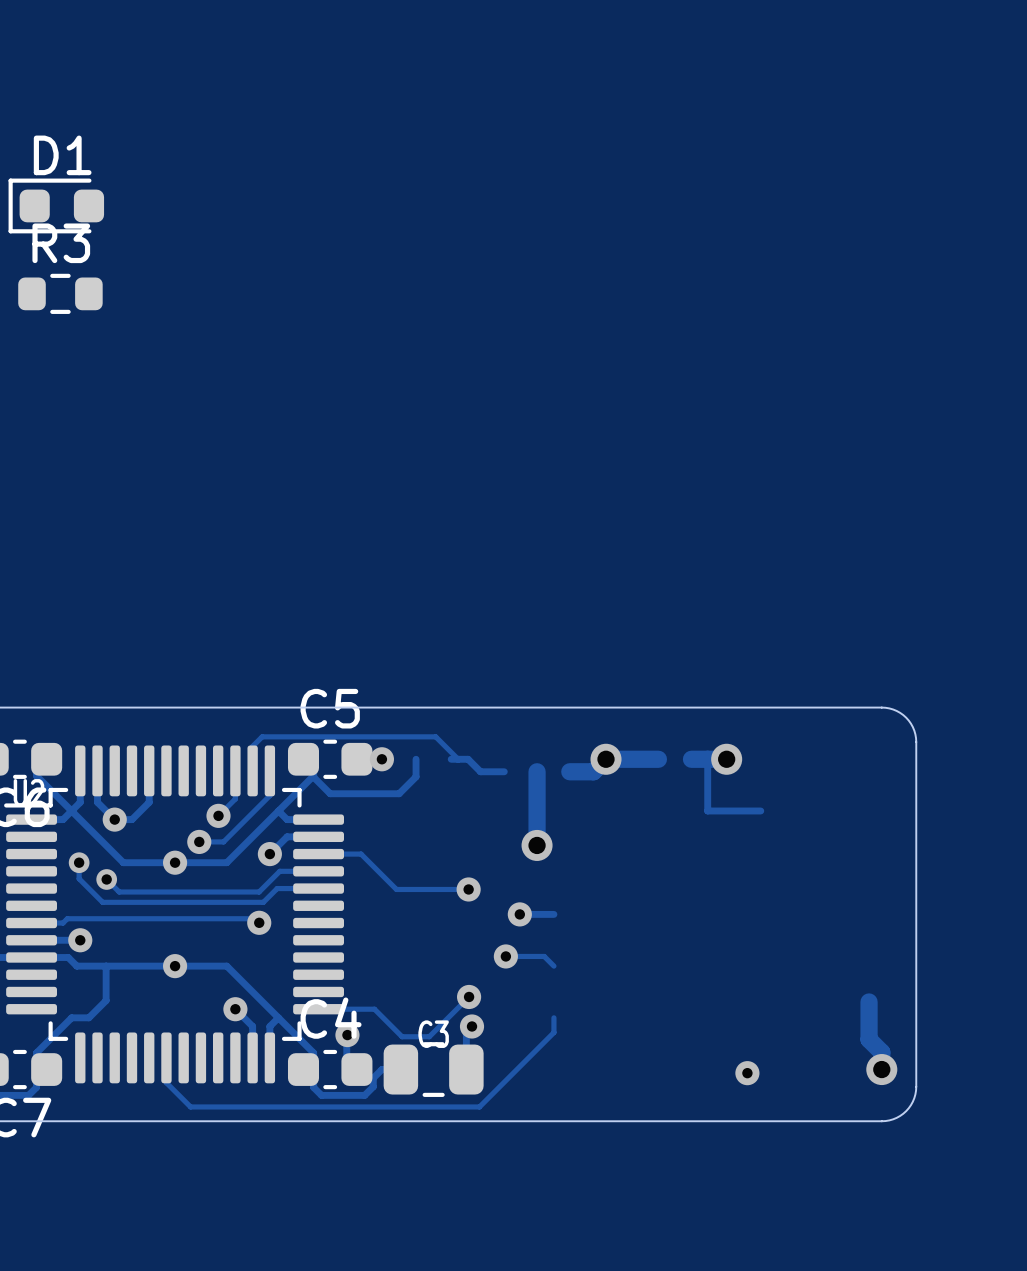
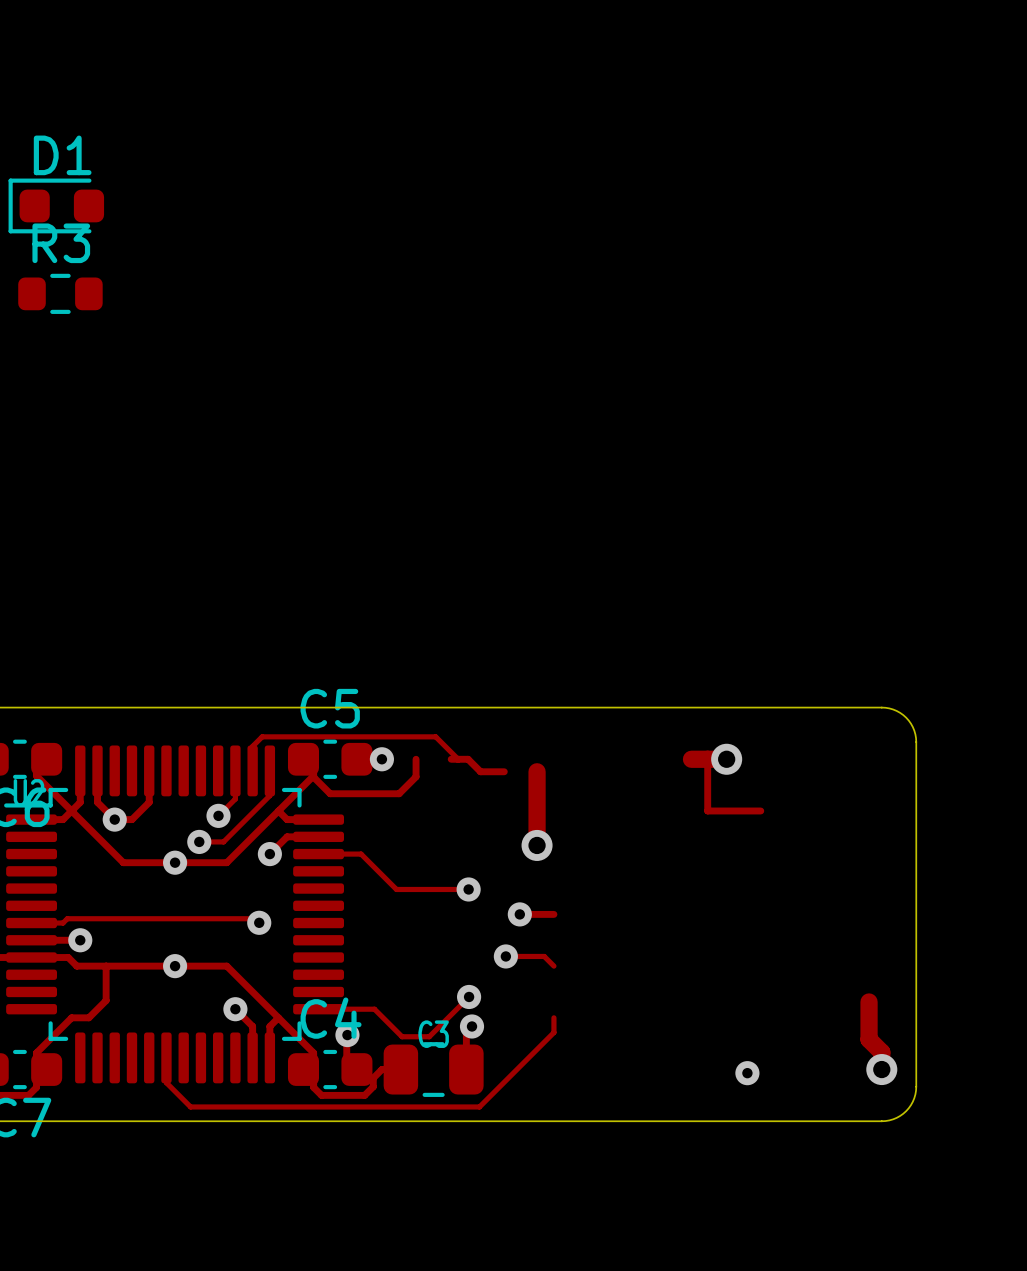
via: (606, 759) -> none
track: (658, 759) (606, 759) (593, 771) (569, 771) -> none
track: (79, 862) (79, 878) (102, 902) (263, 902) (277, 888) (318, 888) -> none
via: (79, 862) -> none
track: (318, 871) (279, 871) (259, 892) (119, 892) (106, 879) -> none
via: (106, 879) -> none

